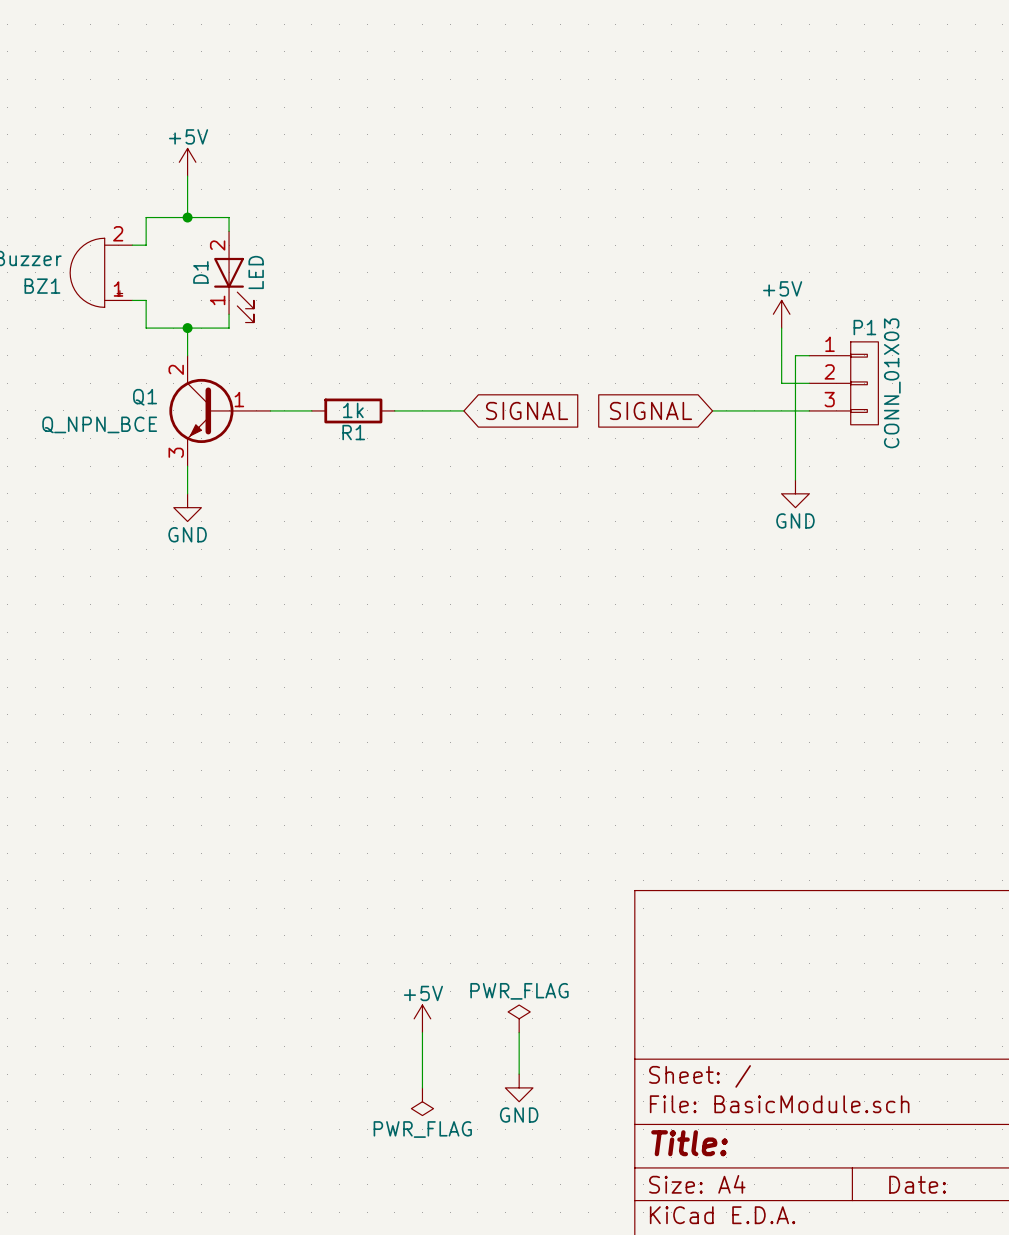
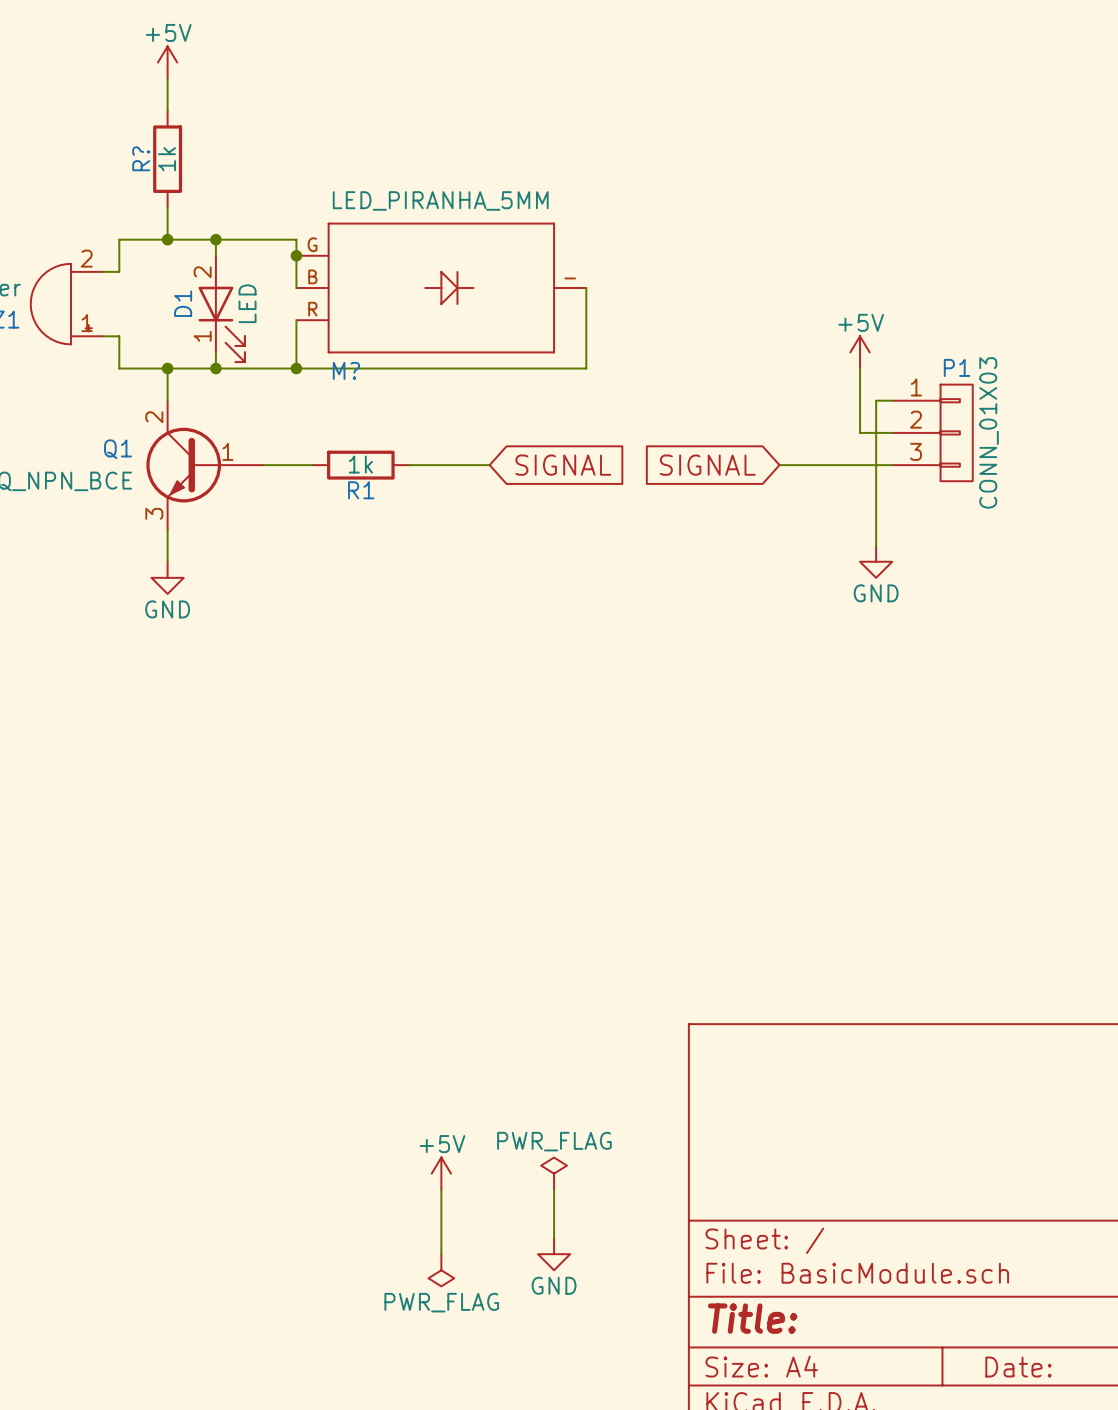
wire: none -> (167, 78) (167, 110)
R?: none -> 1k (167, 159)
power symbol position: +5V (187, 162) -> +5V (167, 62)
wire: none -> (215, 239) (296, 239) (296, 288)
junction: none -> (215, 239)
junction: none -> (296, 255)
M?: none -> LED_PIRANHA_5MM (441, 288)
wire: none -> (586, 288) (586, 368) (215, 368)
wire: none -> (296, 320) (296, 368)
junction: none -> (215, 368)
junction: none -> (296, 368)

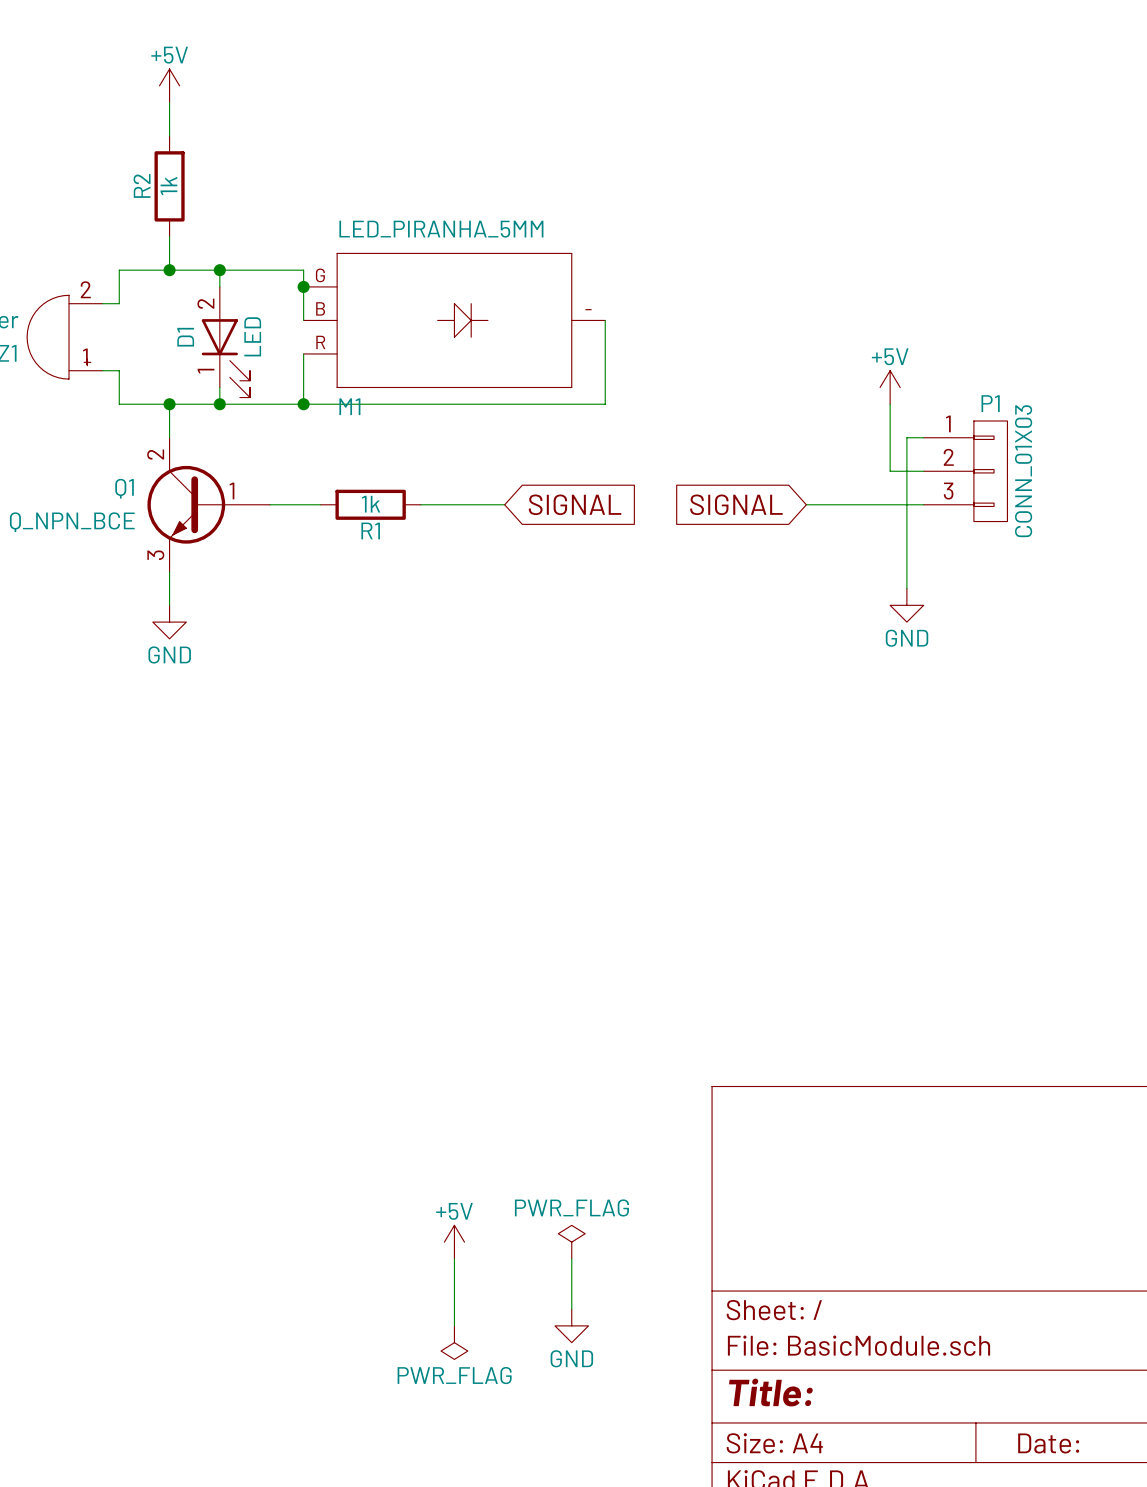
R? name: R? (141, 158) -> R2 (142, 185)
M? name: M? (346, 370) -> M1 (349, 406)

